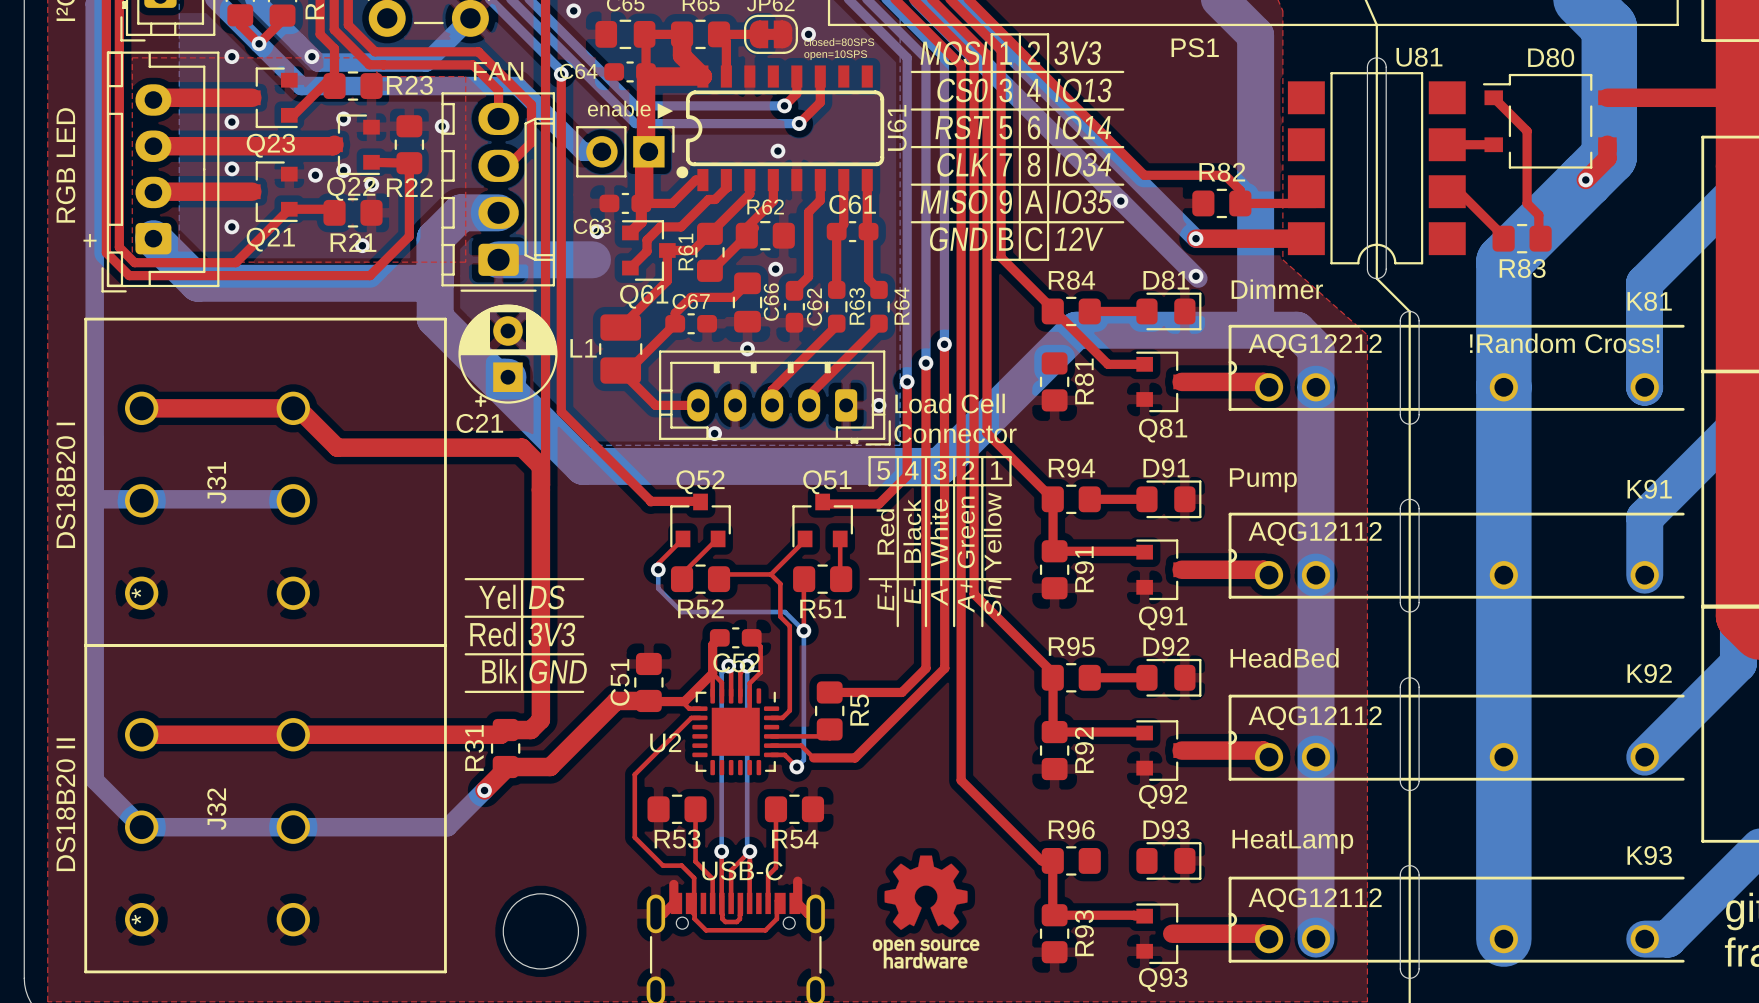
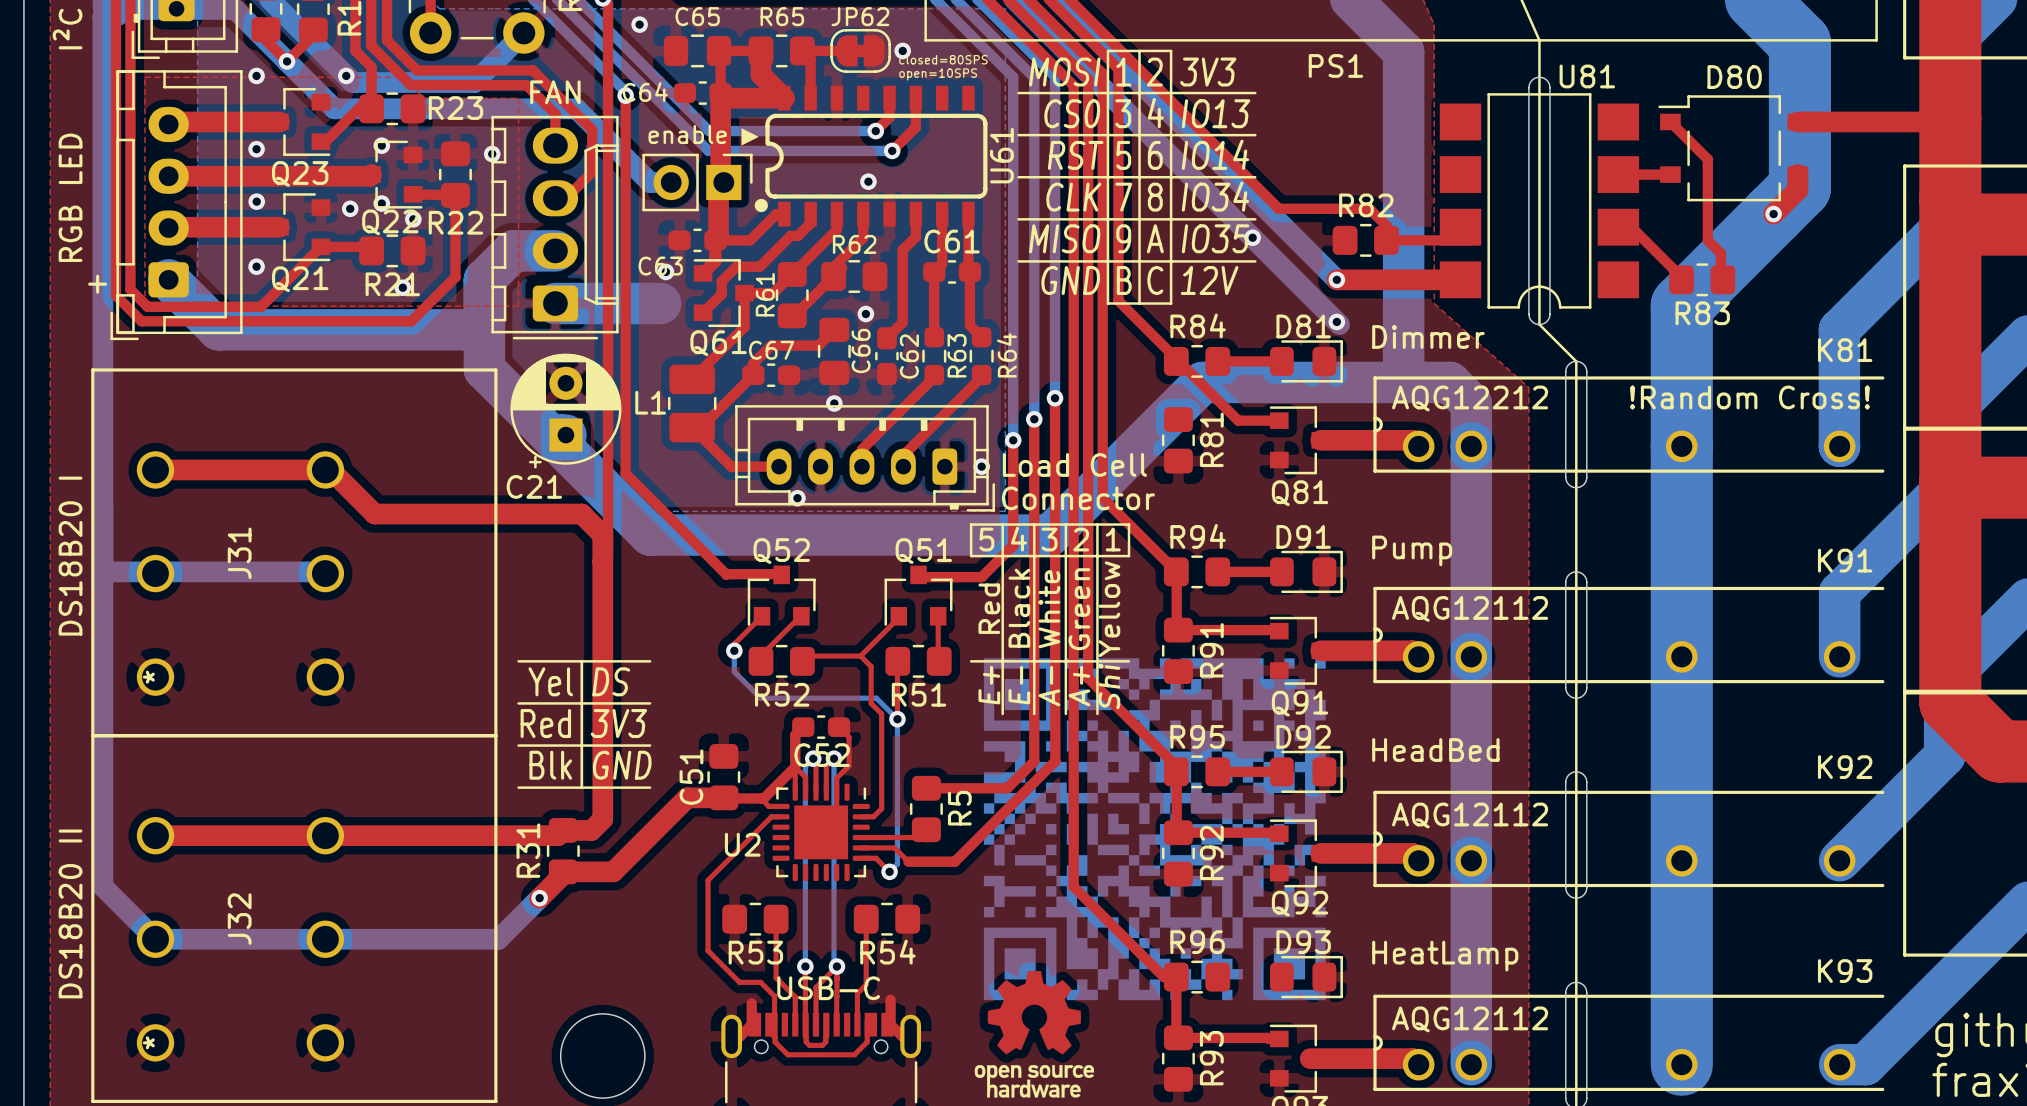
part: none -> (1154, 829)

